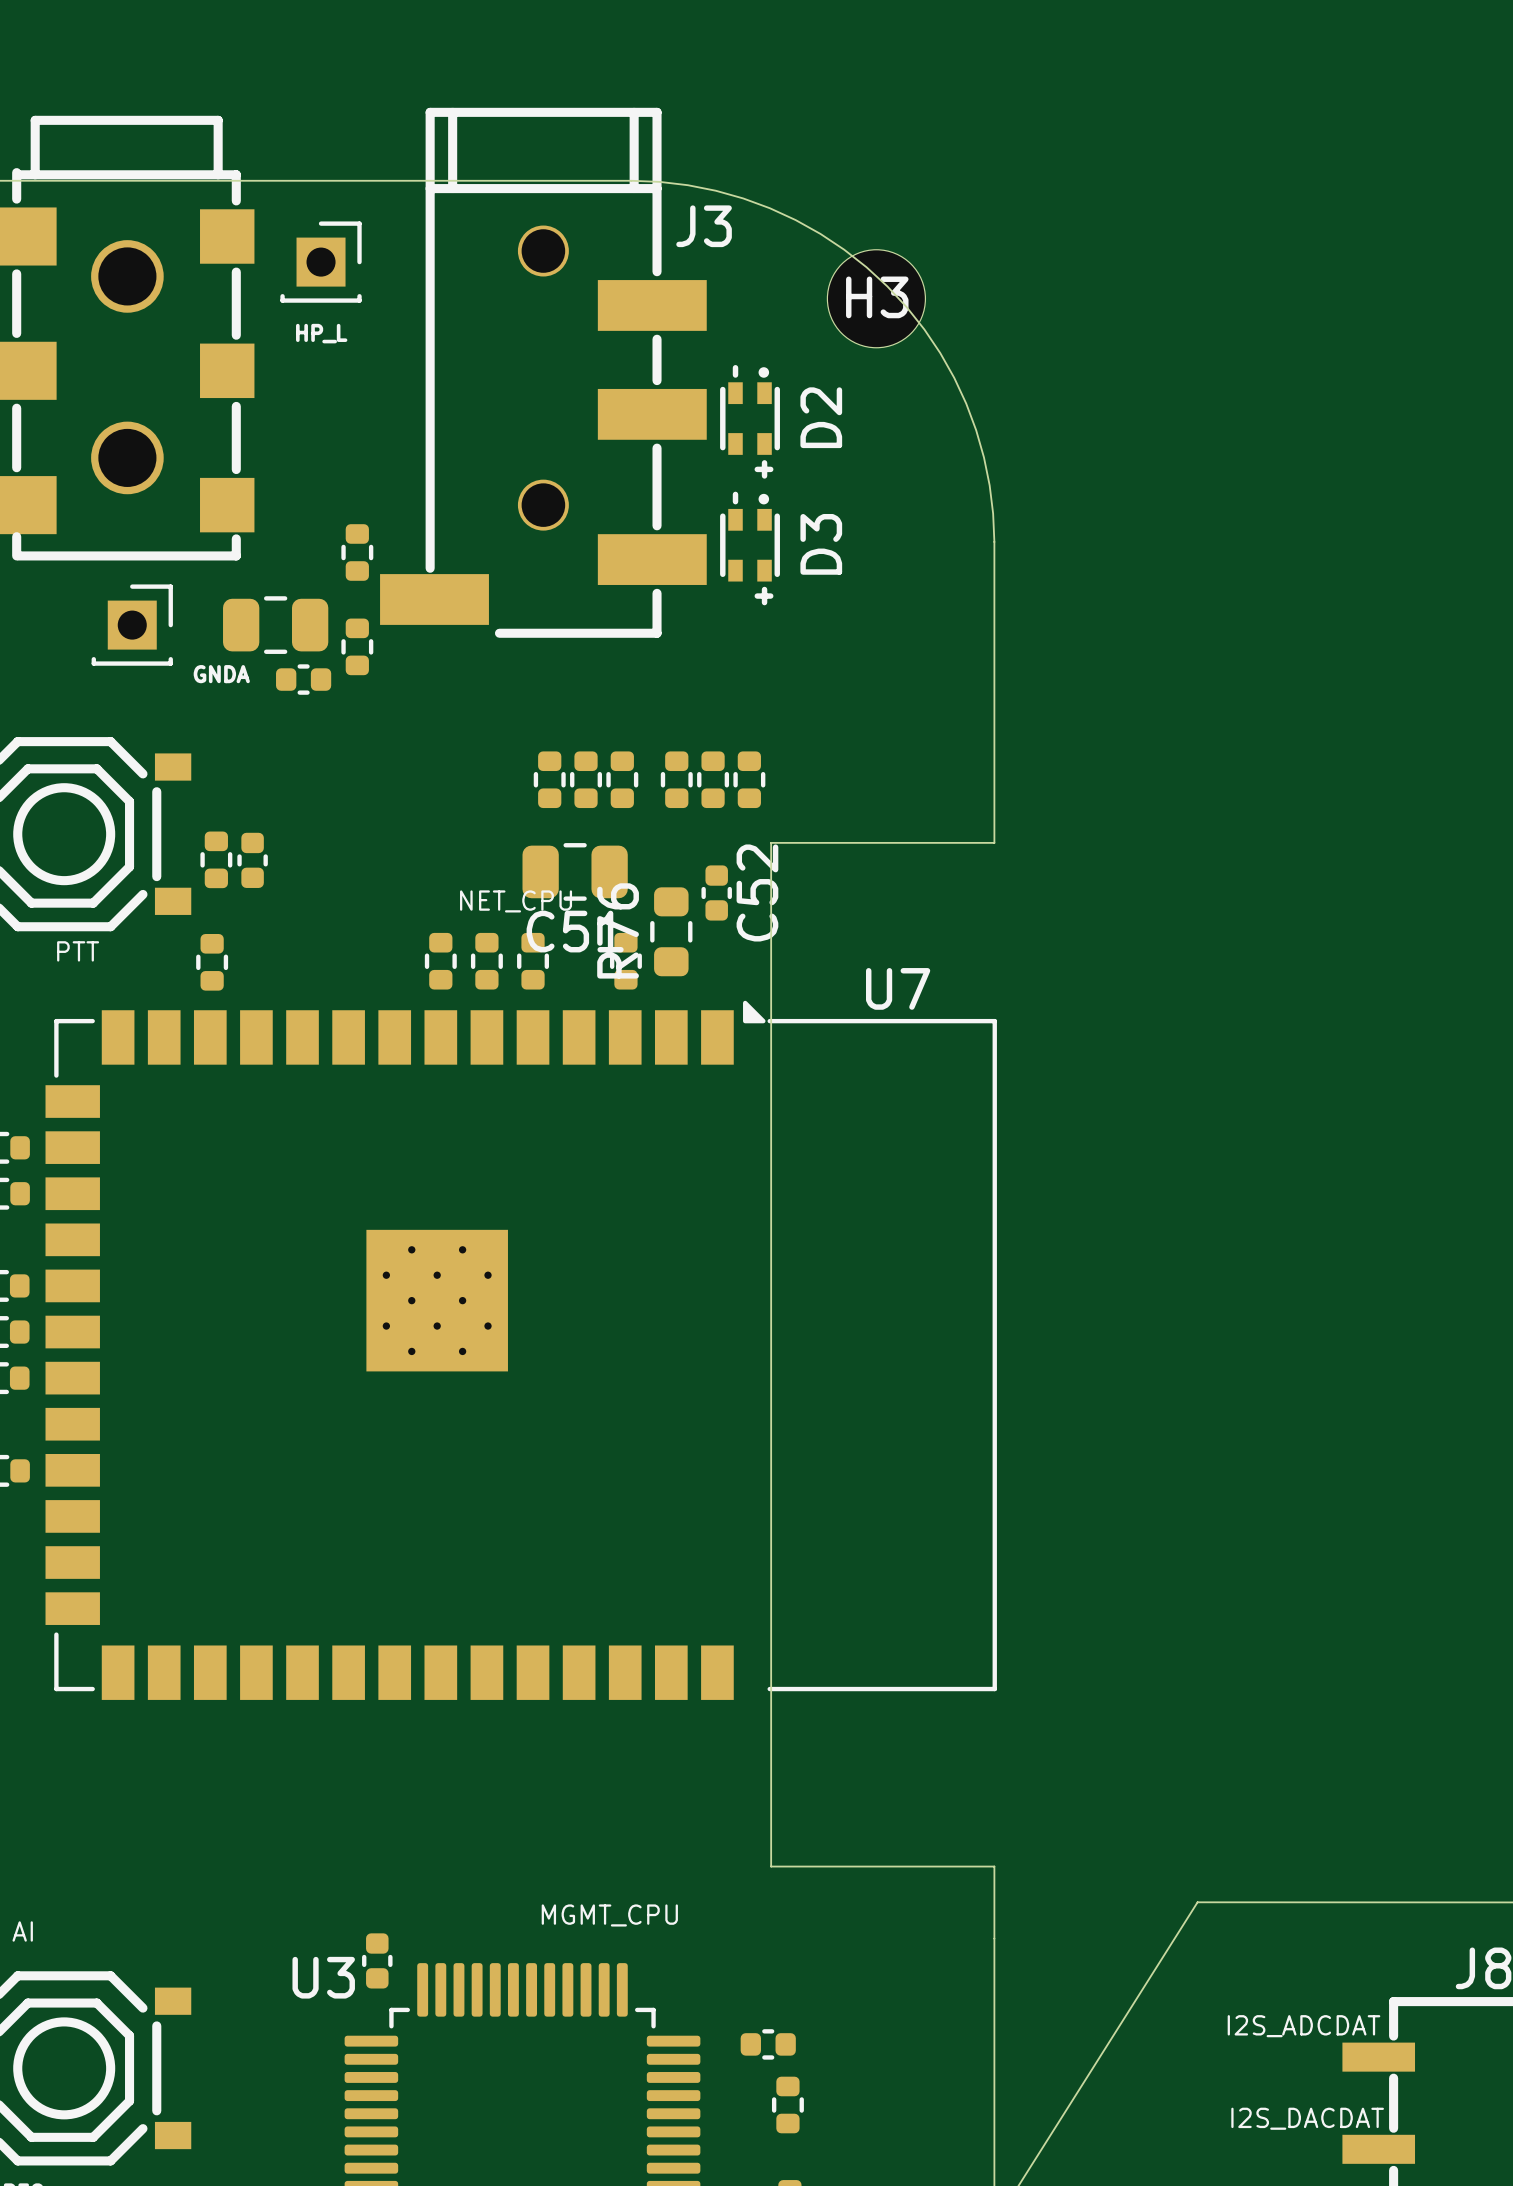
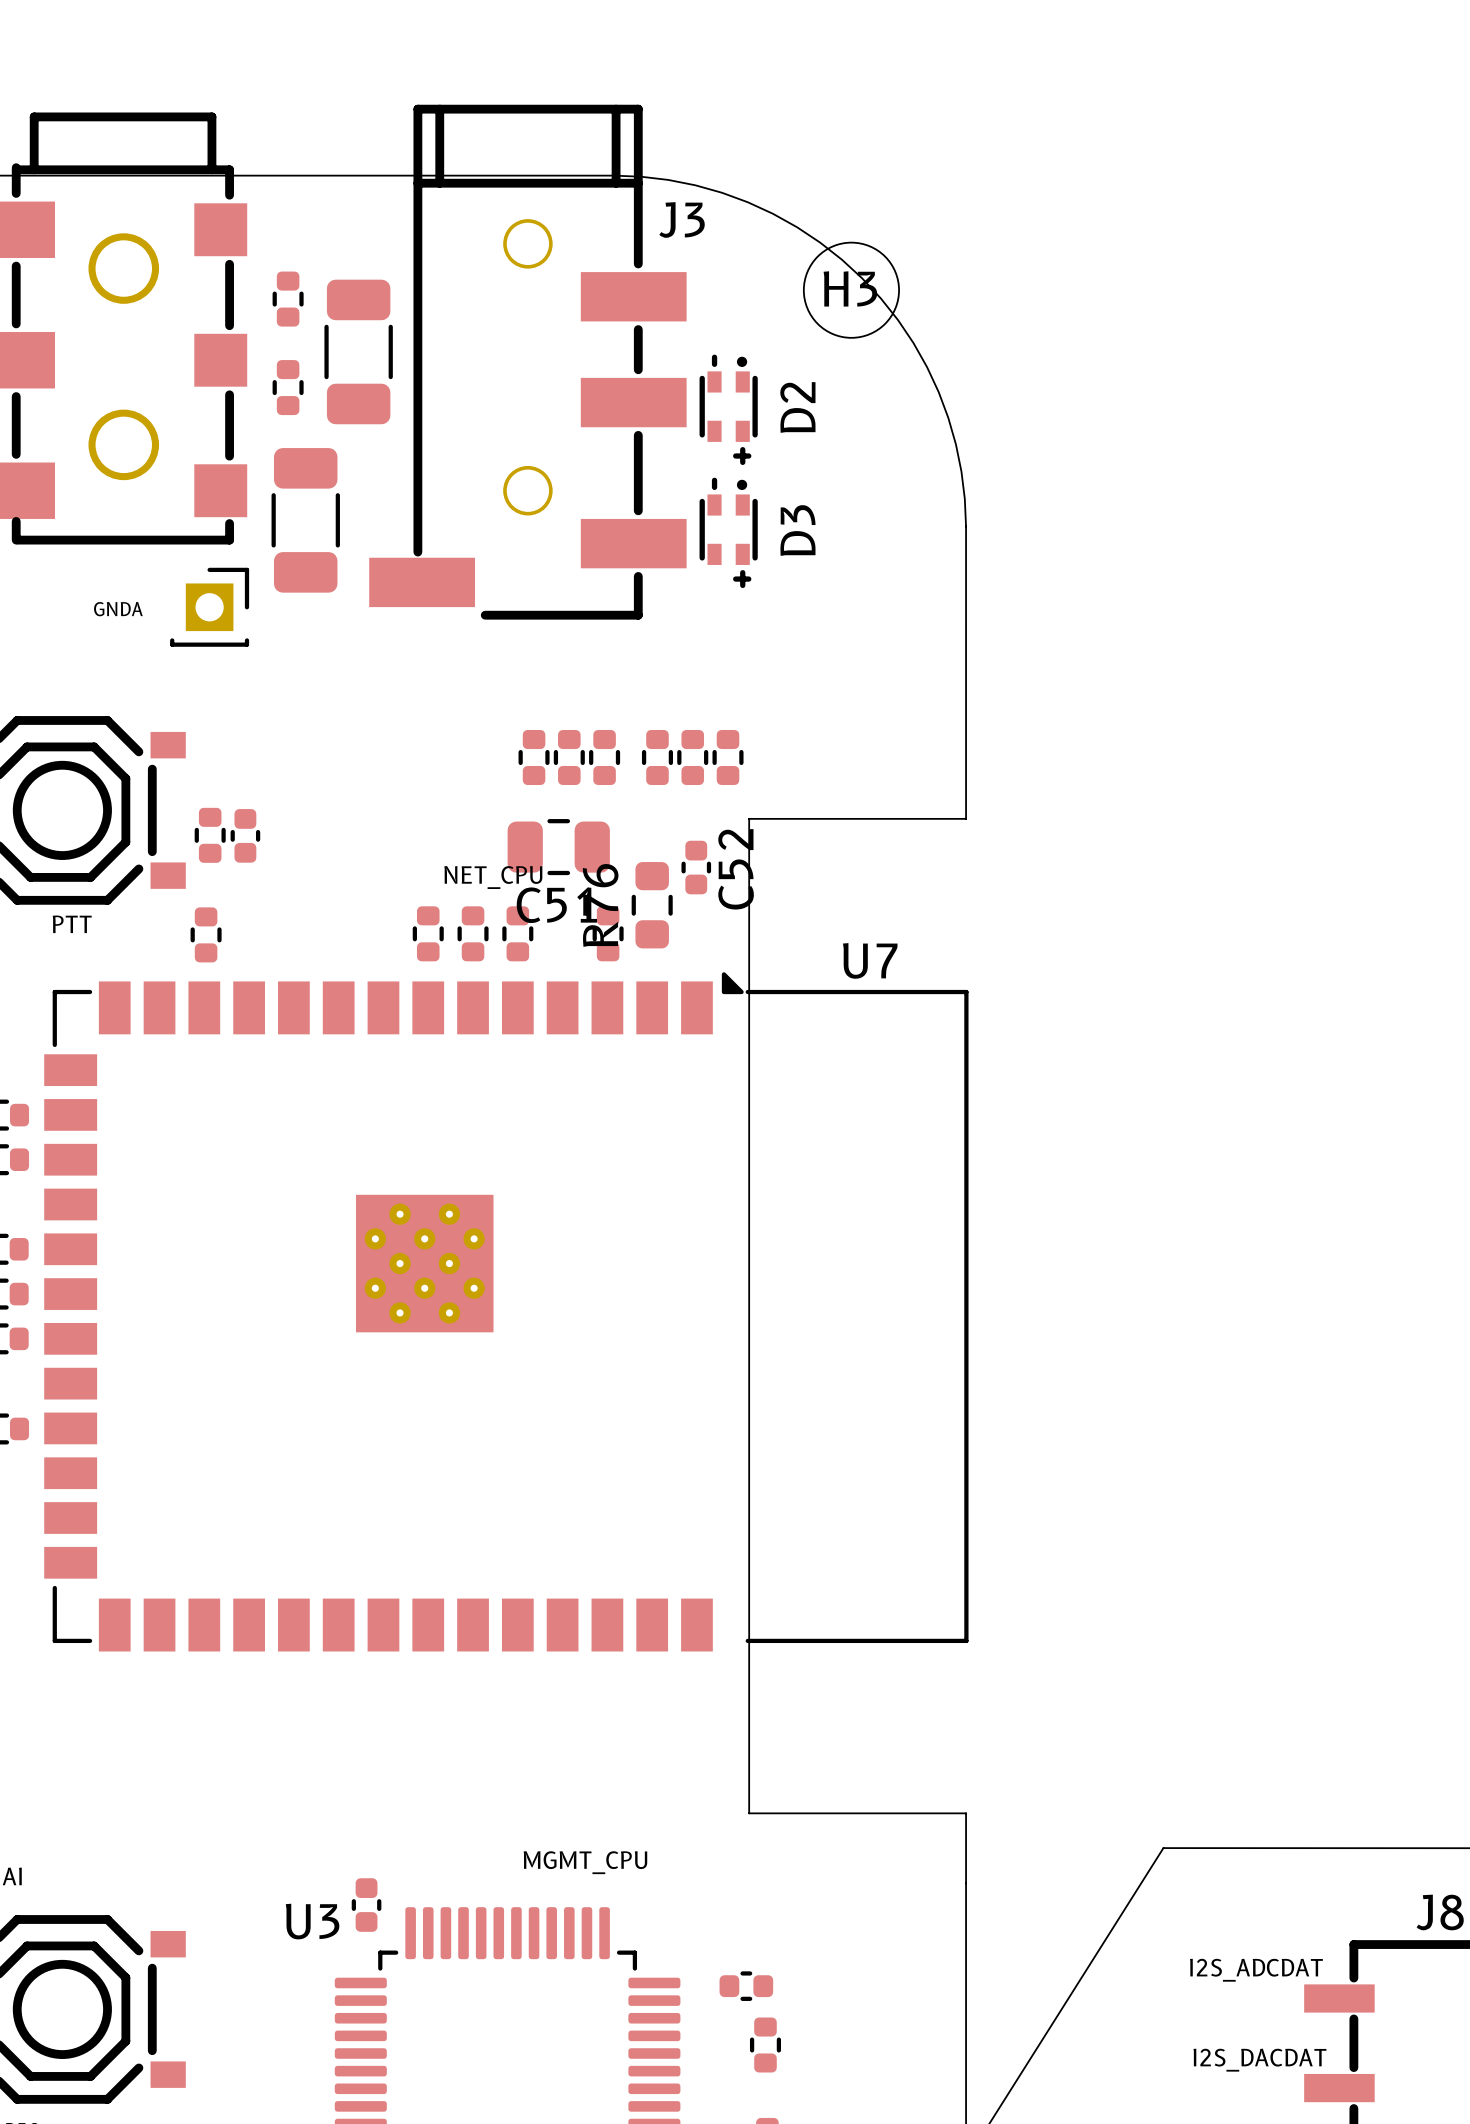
part: (321, 262) -> none
part: none -> (288, 299)
text: HP_L (321, 333) -> none
part: none -> (358, 351)
part: none -> (288, 387)
part: none -> (305, 520)
part: (357, 552) -> none
part position: (132, 625) -> (209, 607)
part: (275, 625) -> none
part: (357, 646) -> none
text position: GNDA (221, 674) -> GNDA (118, 609)
part: (303, 679) -> none

